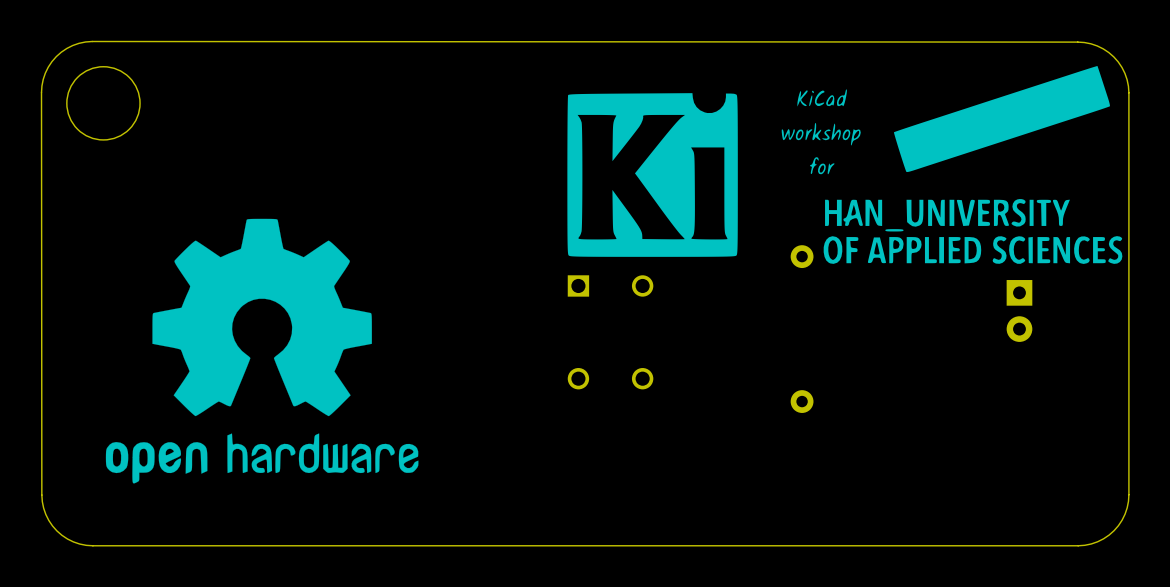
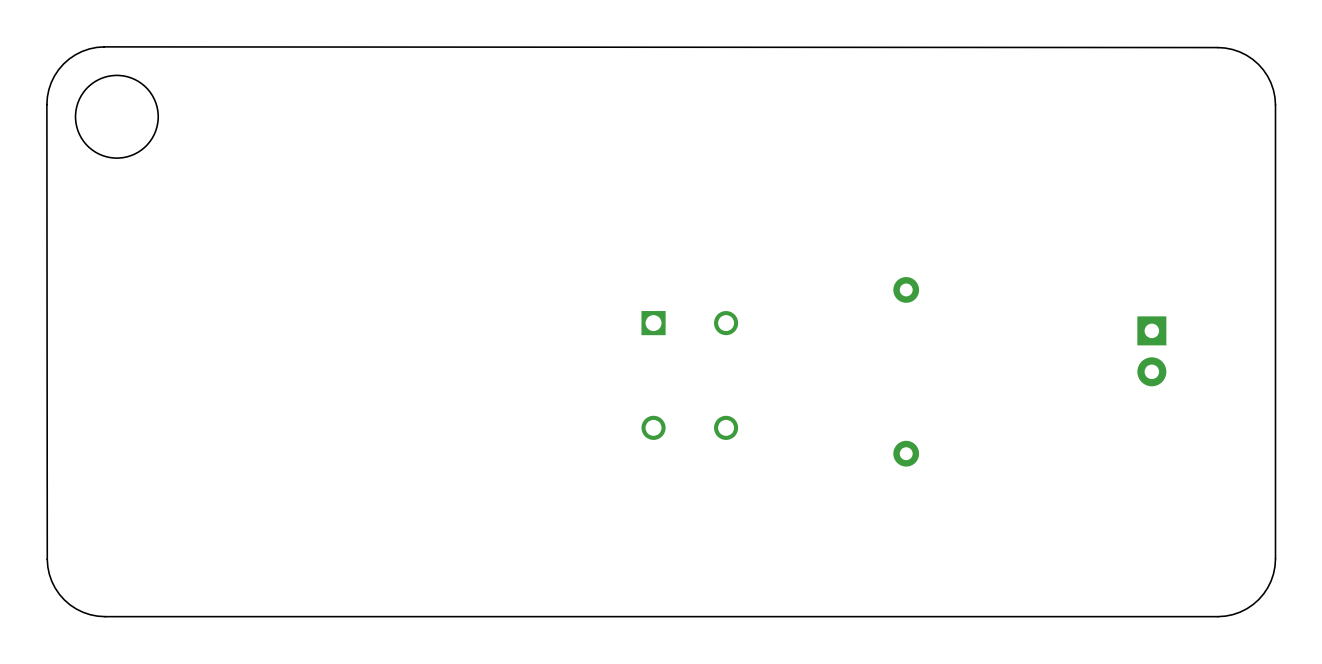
drawing: [567, 65, 1123, 264] -> none
drawing: [105, 218, 419, 484] -> none

